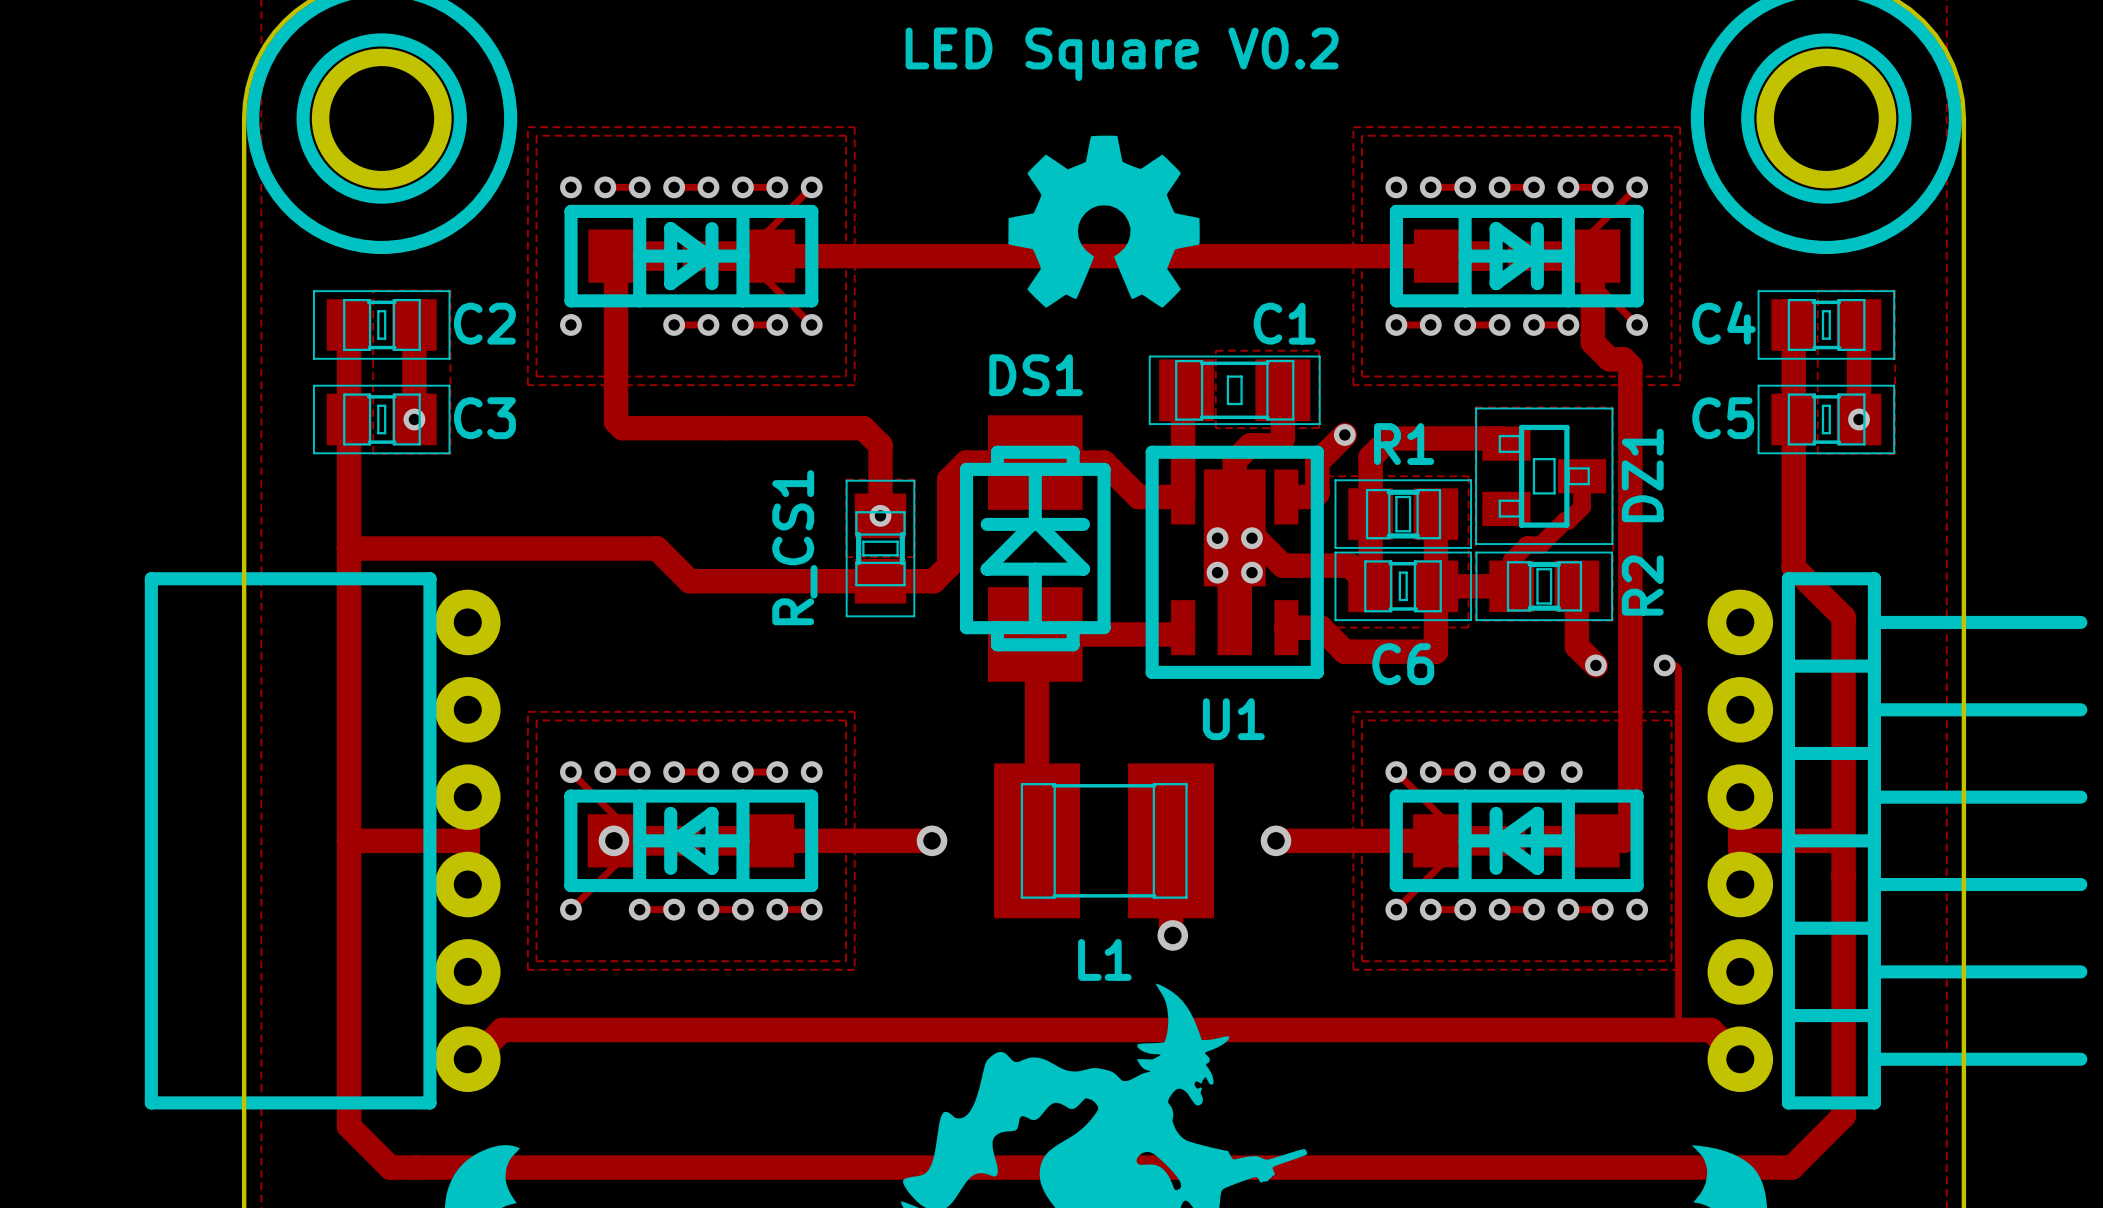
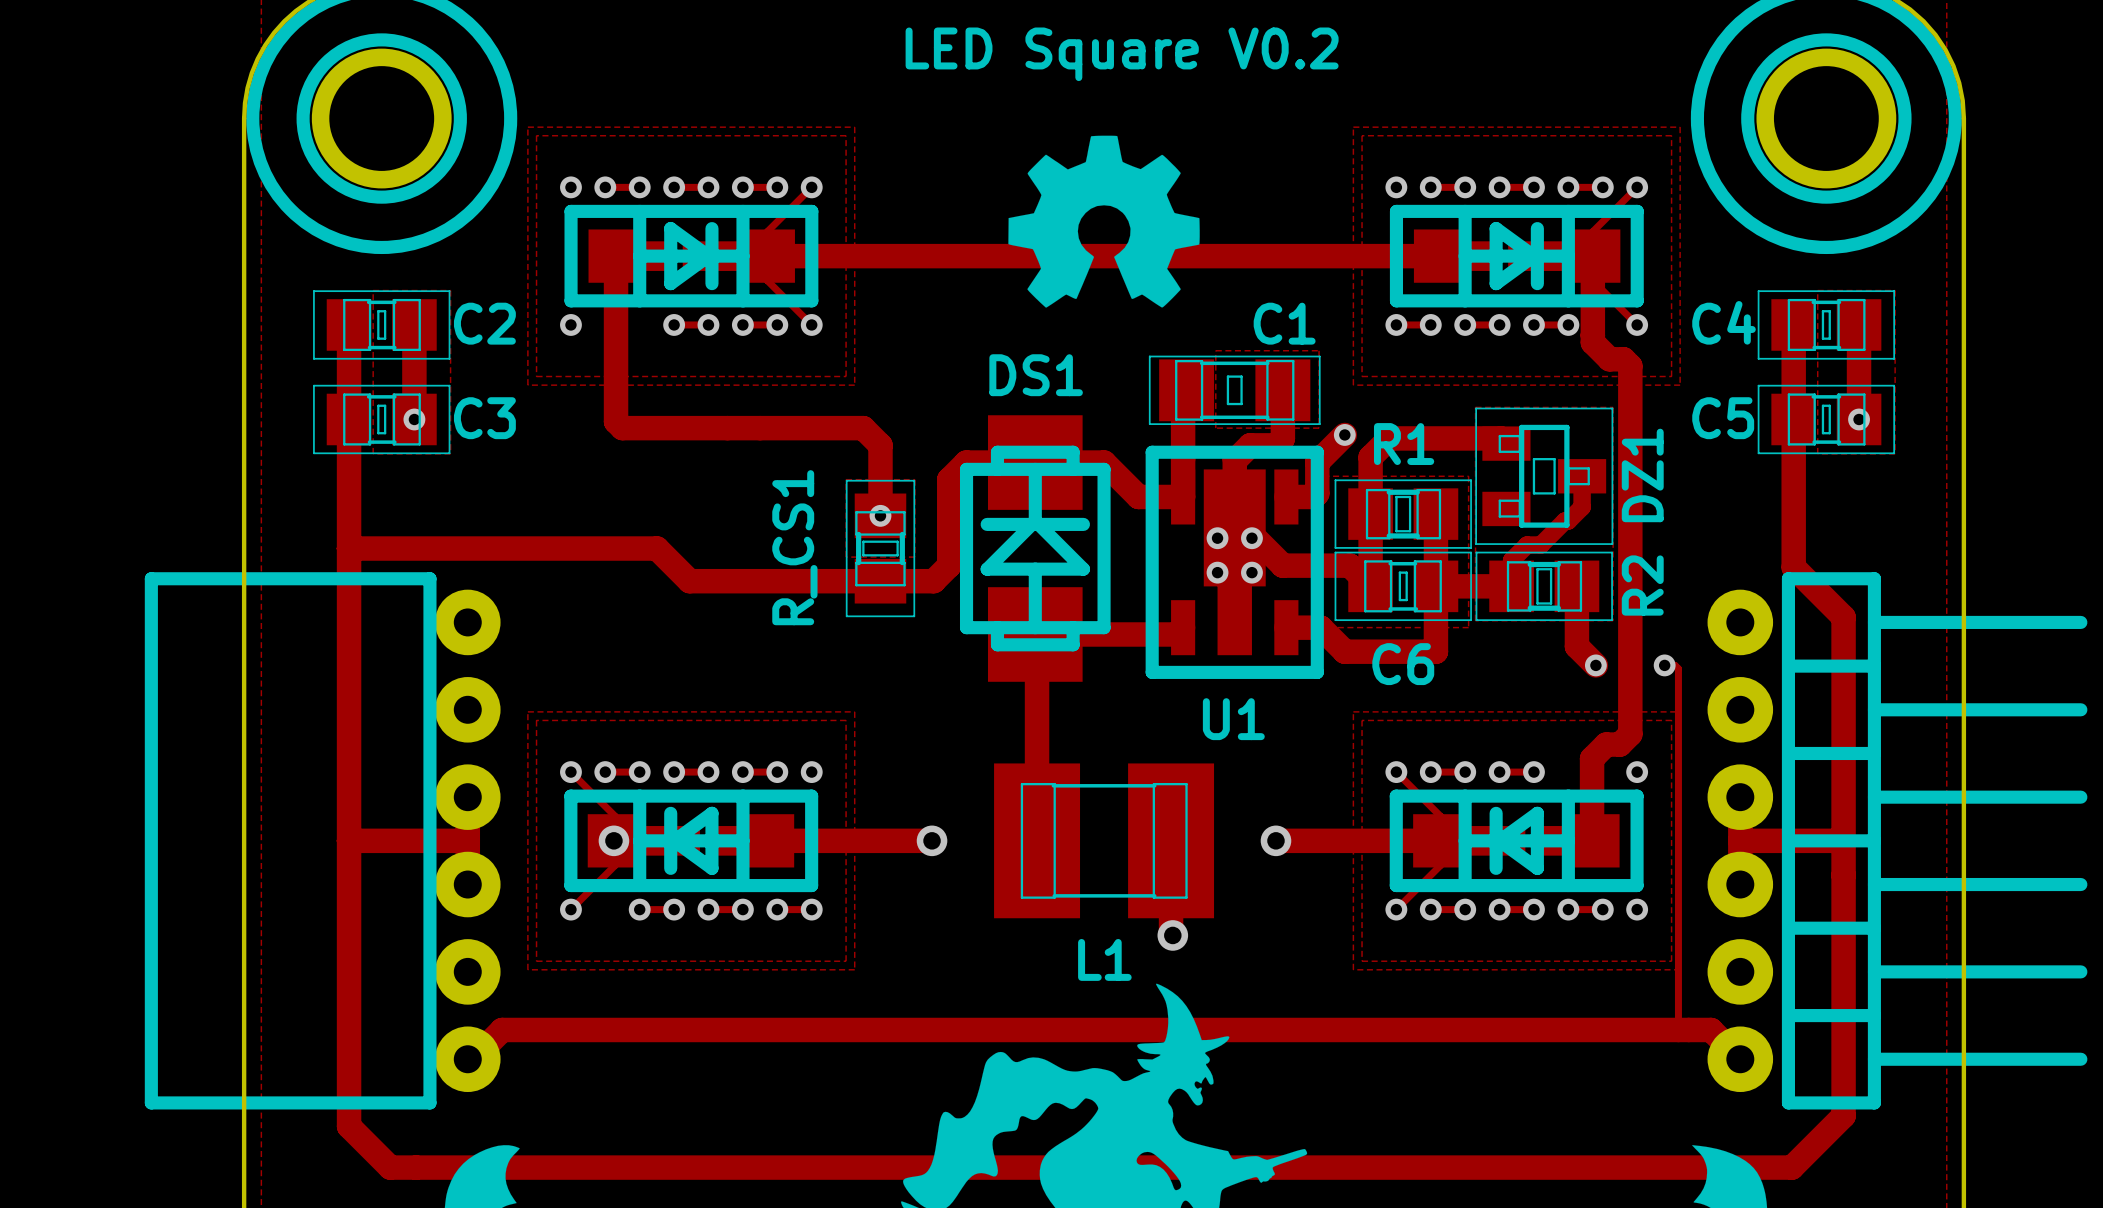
track: (1630, 734) (1630, 833) (1623, 840) (1592, 840) -> (1630, 734) (1619, 744) (1606, 744) (1592, 758) (1592, 840)
via position: (1571, 772) -> (1637, 772)

